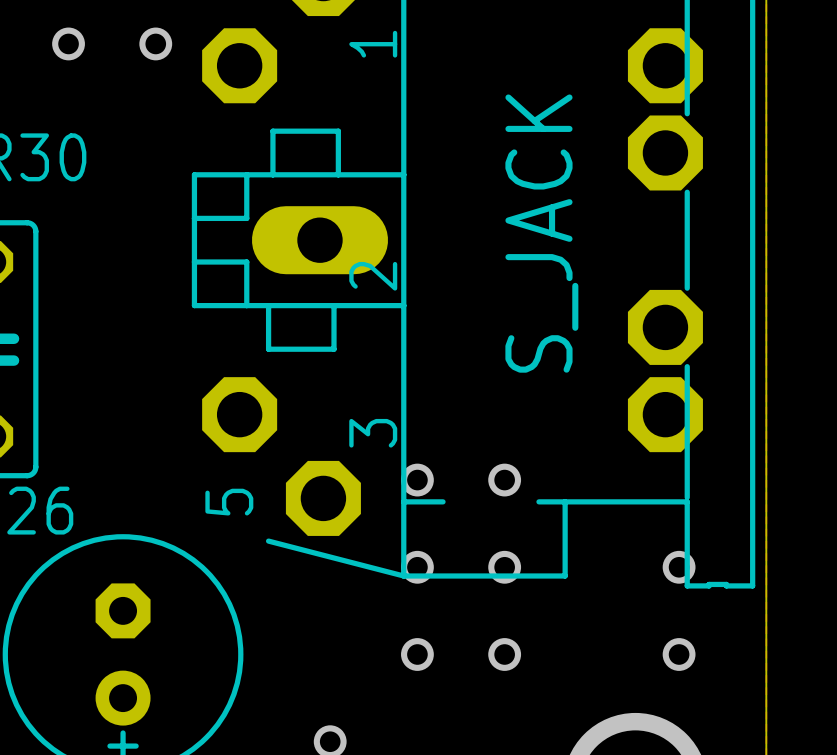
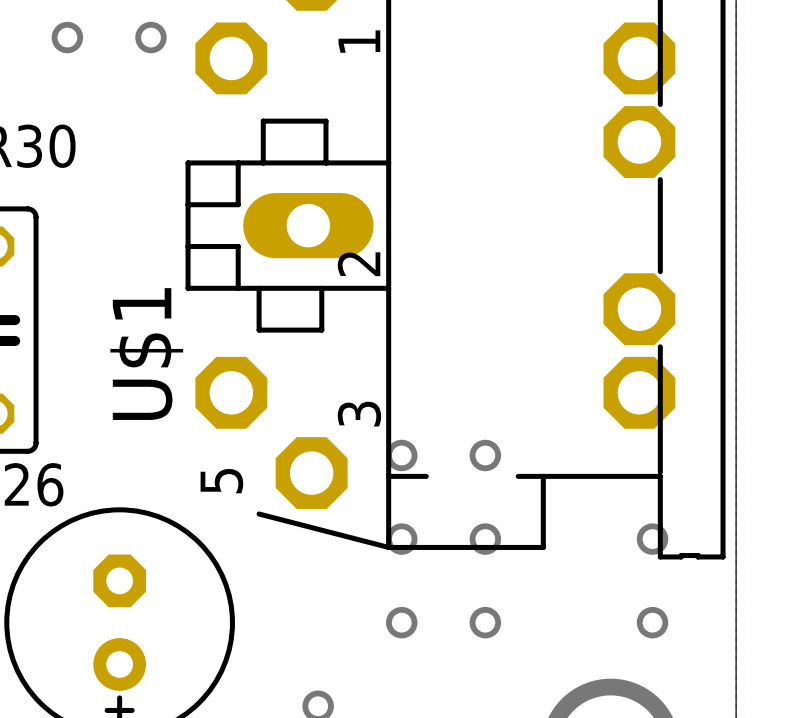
S_JACK name: S_JACK (541, 233) -> U$1 (146, 354)

